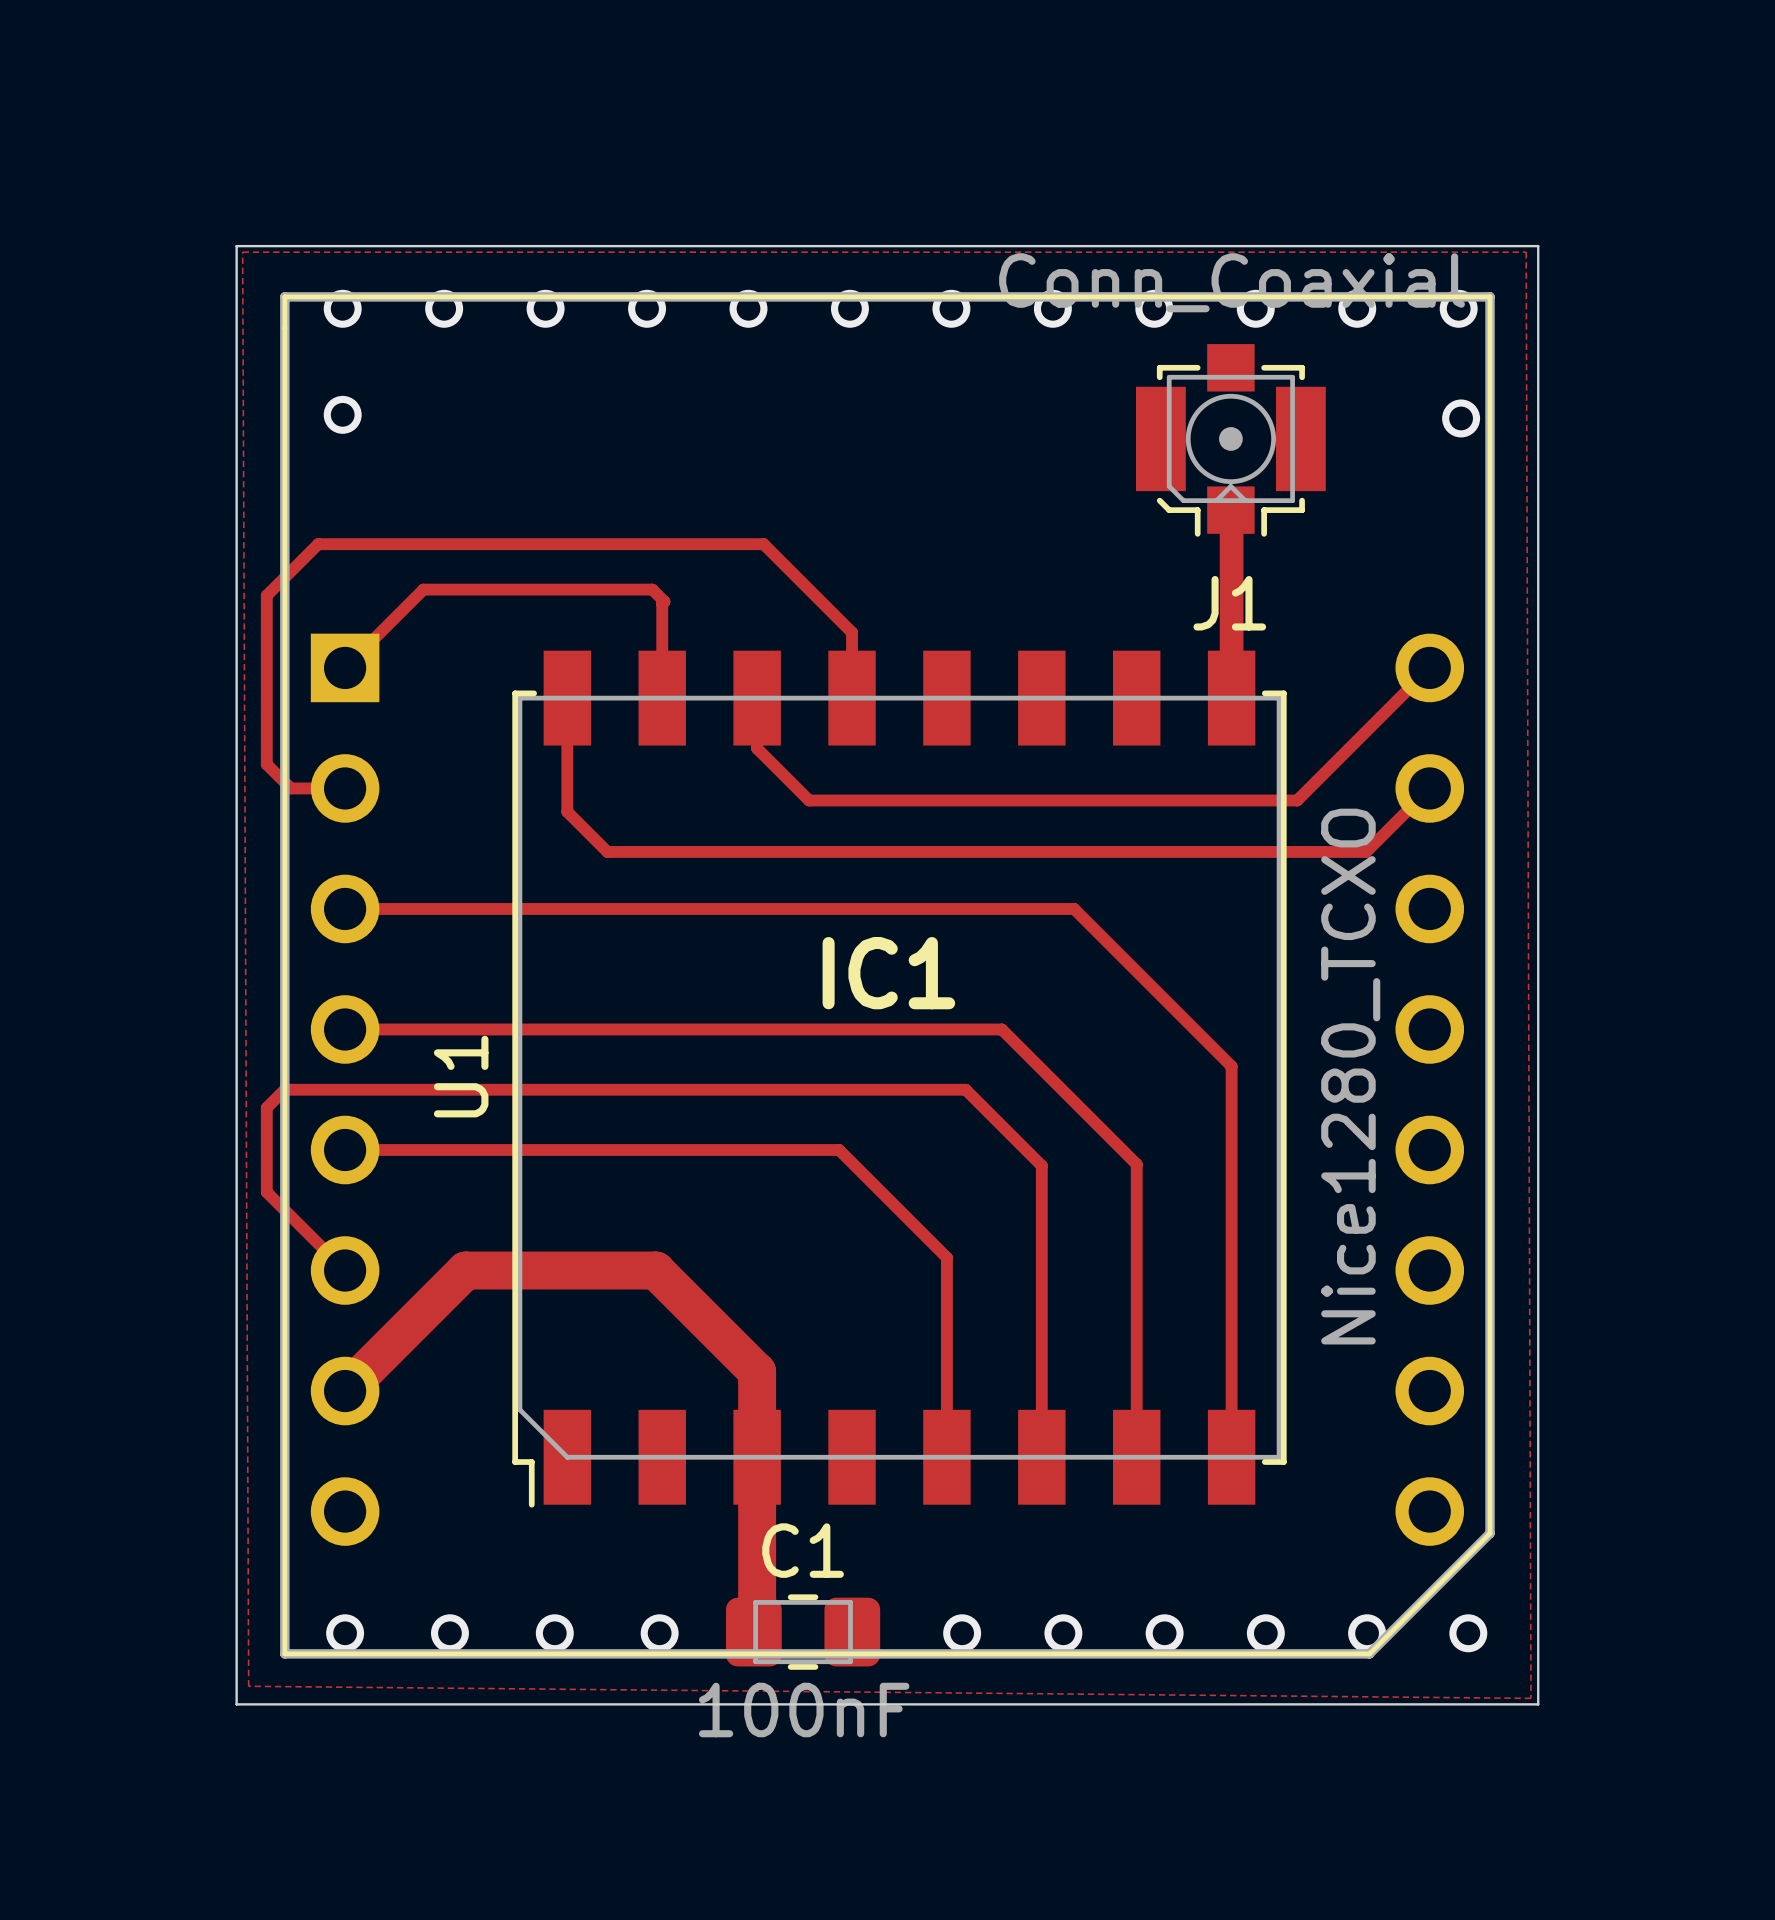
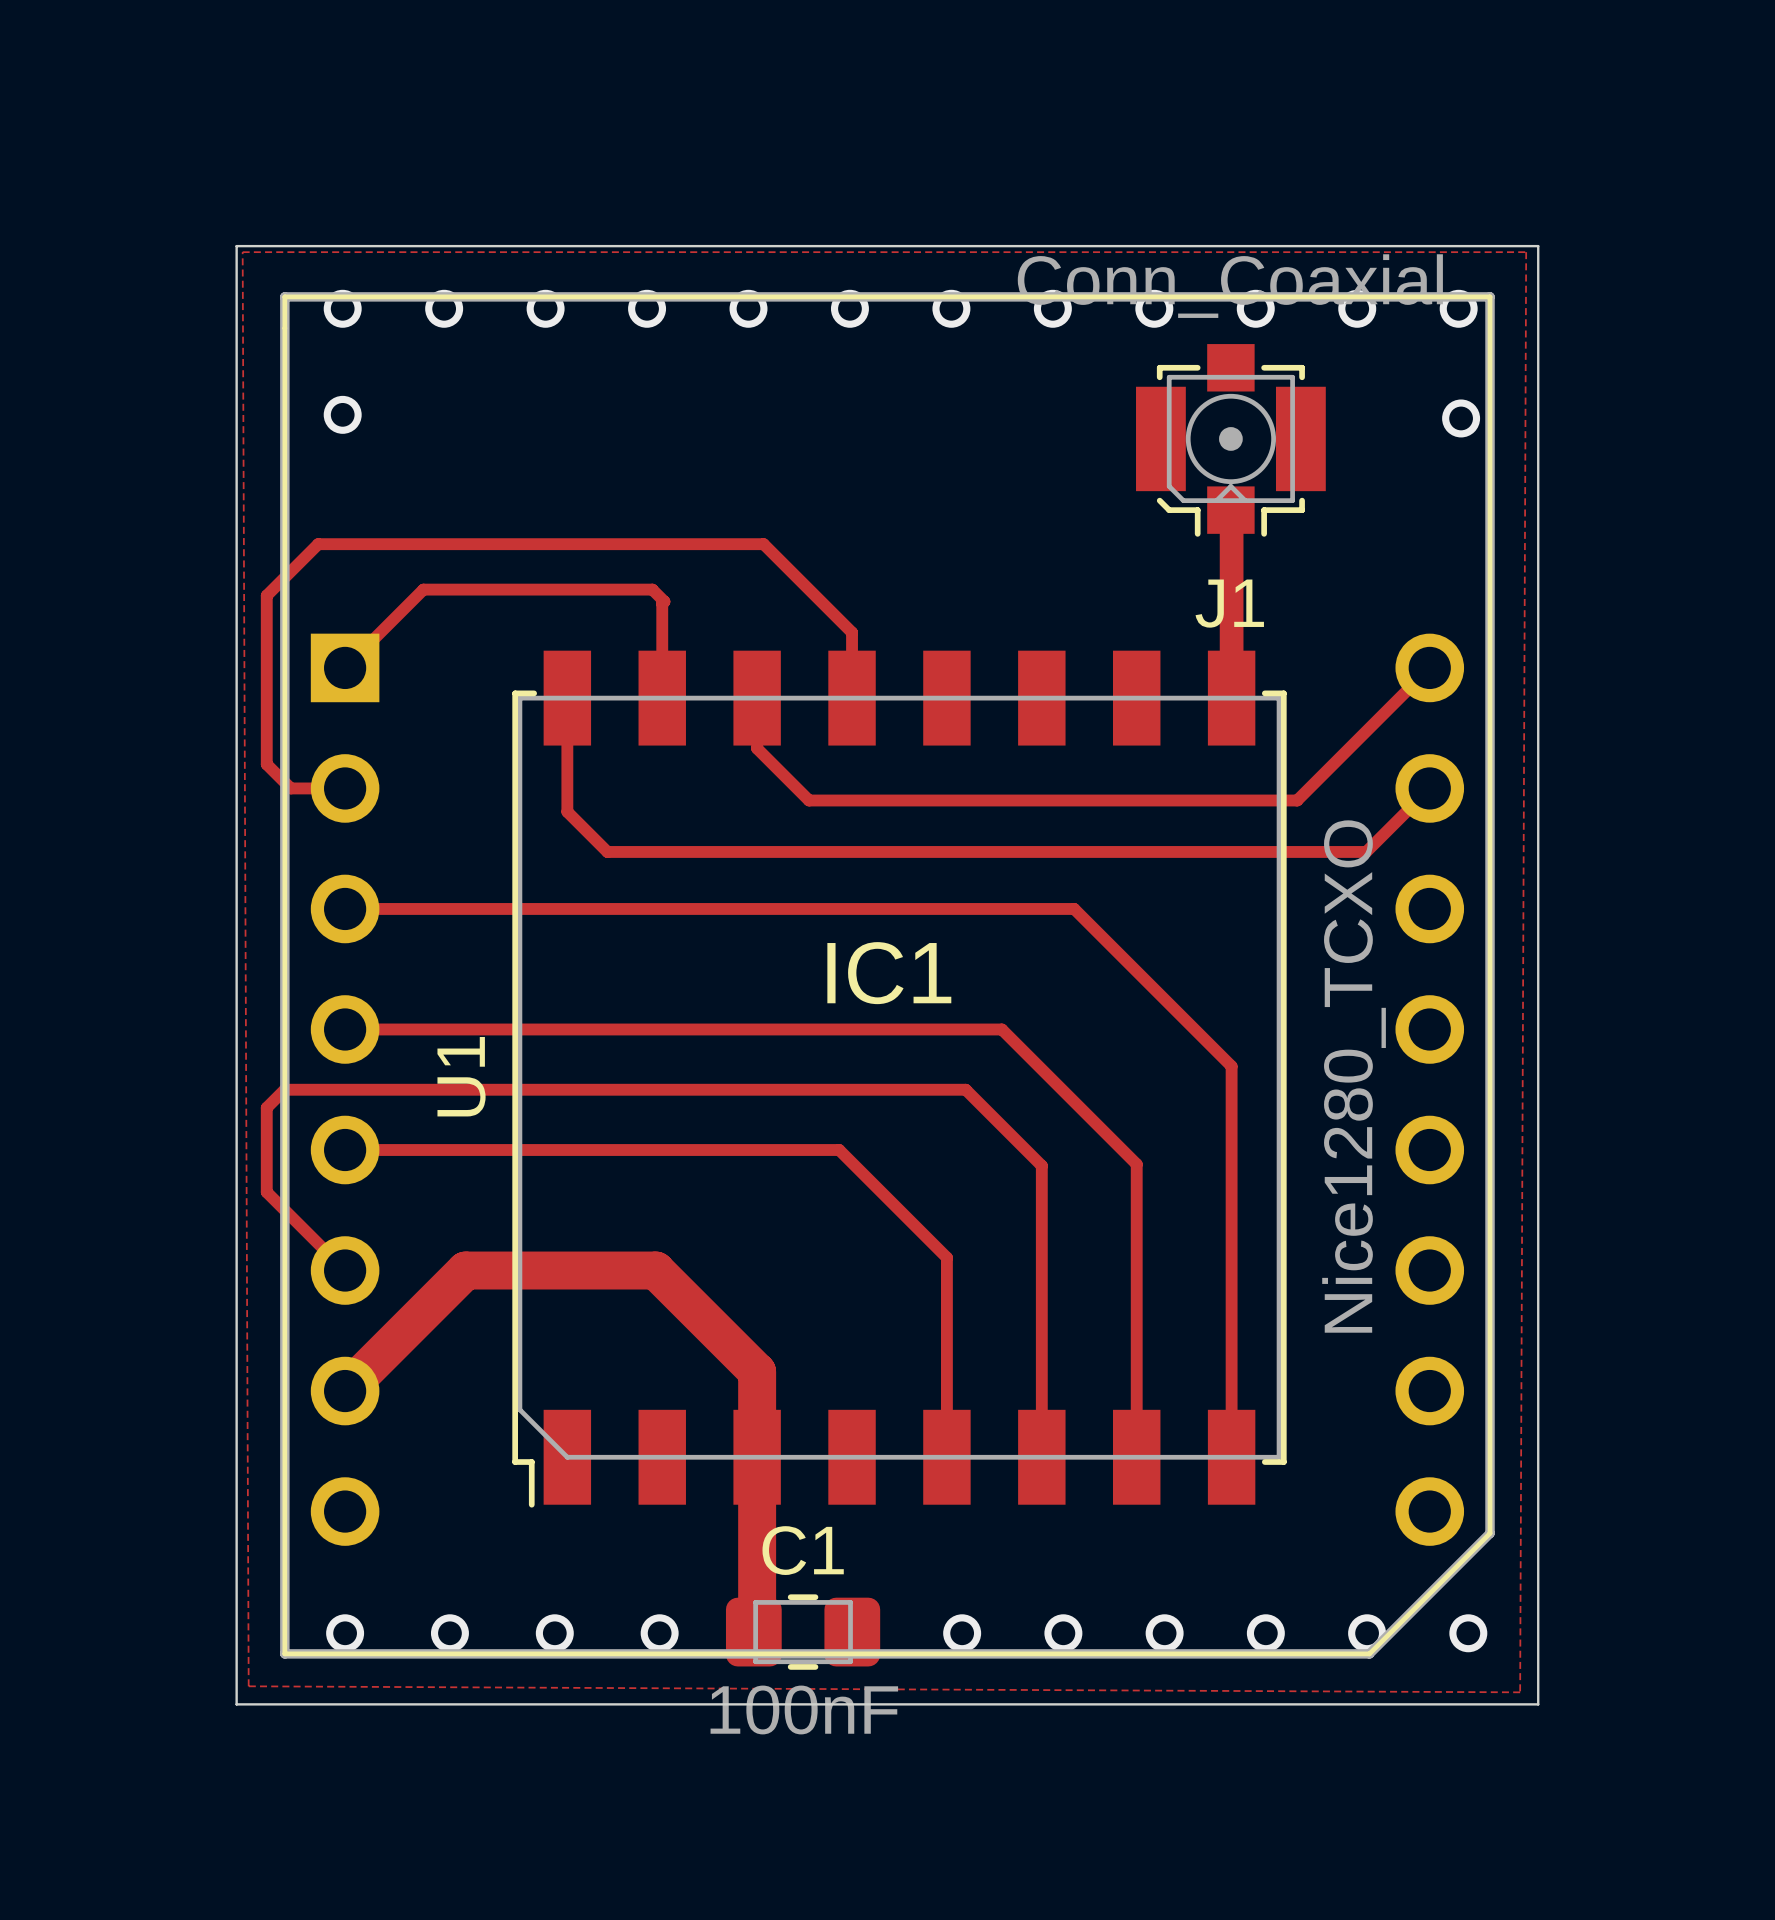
zone outline: (1526, 252) (1530, 1698) (248, 1686) -> (1526, 252) (1520, 1692) (248, 1686)

